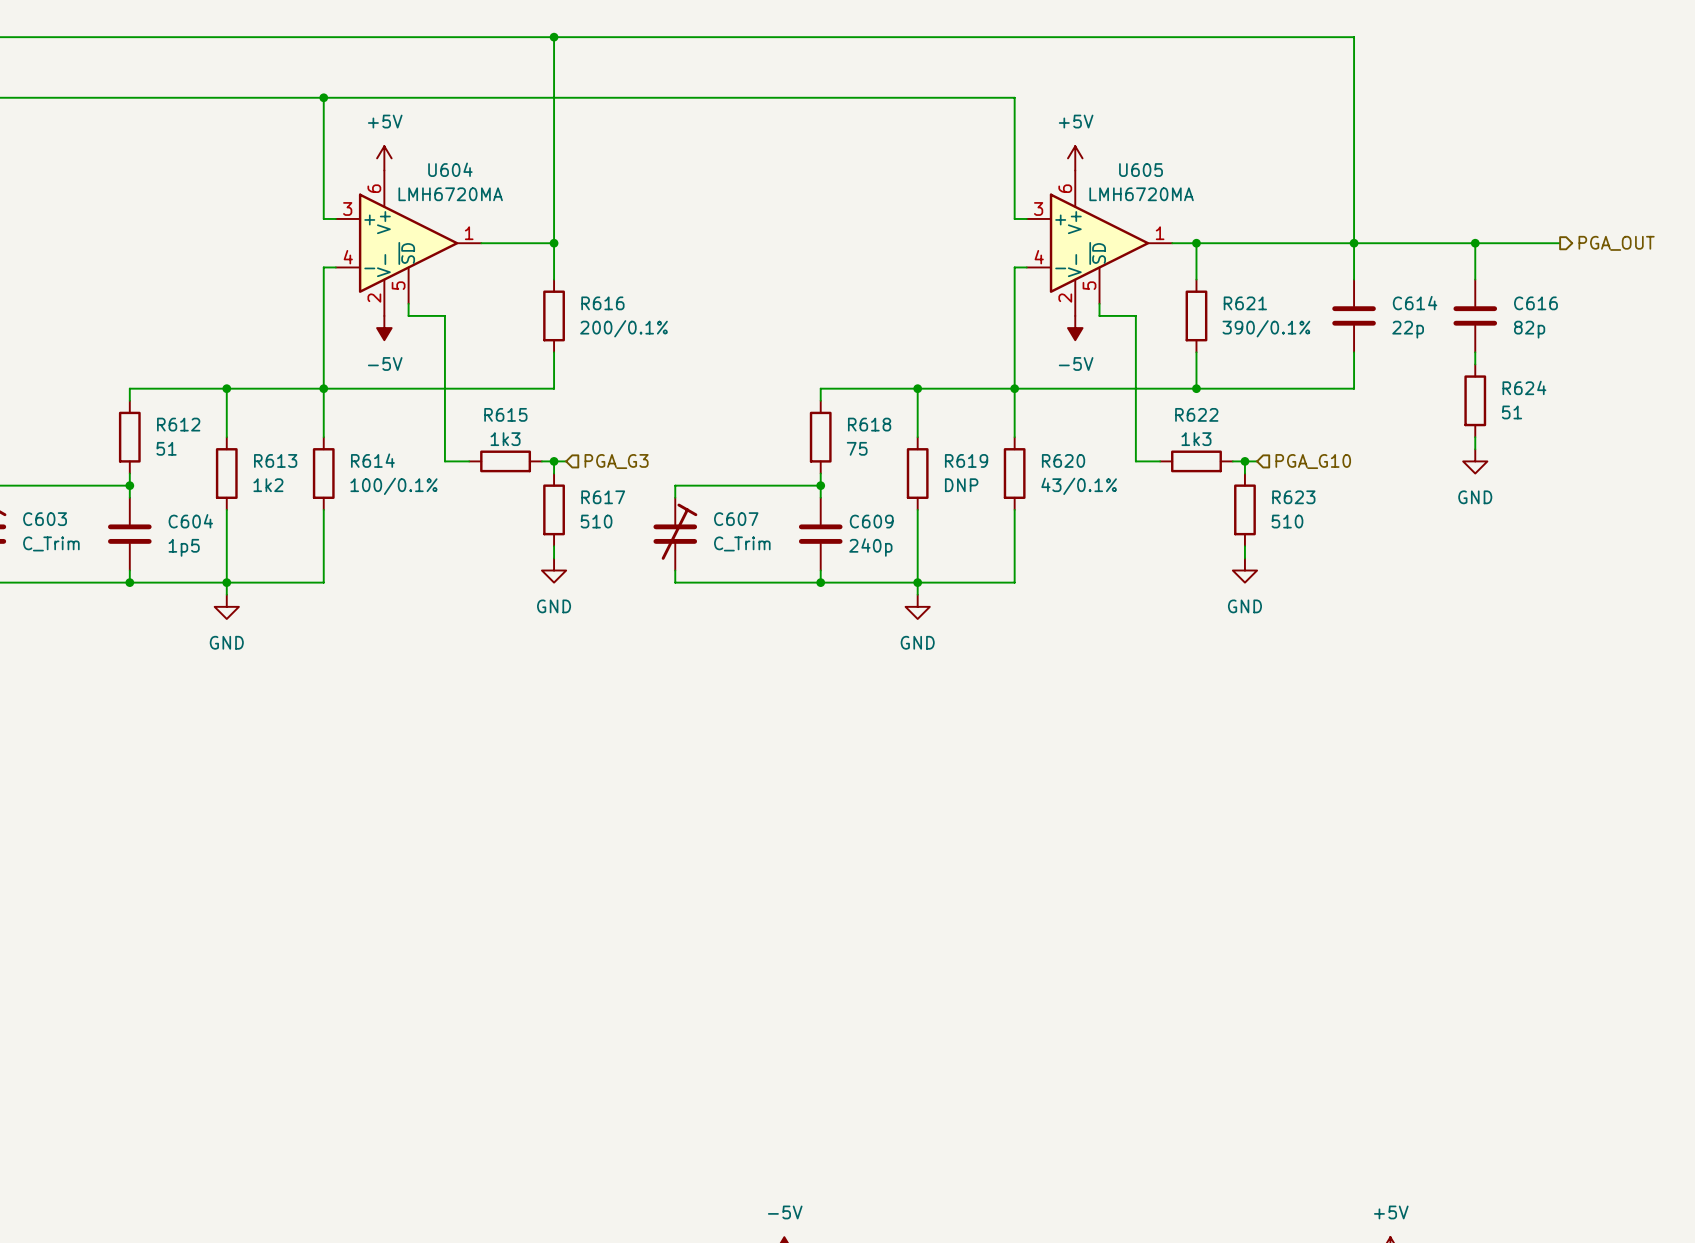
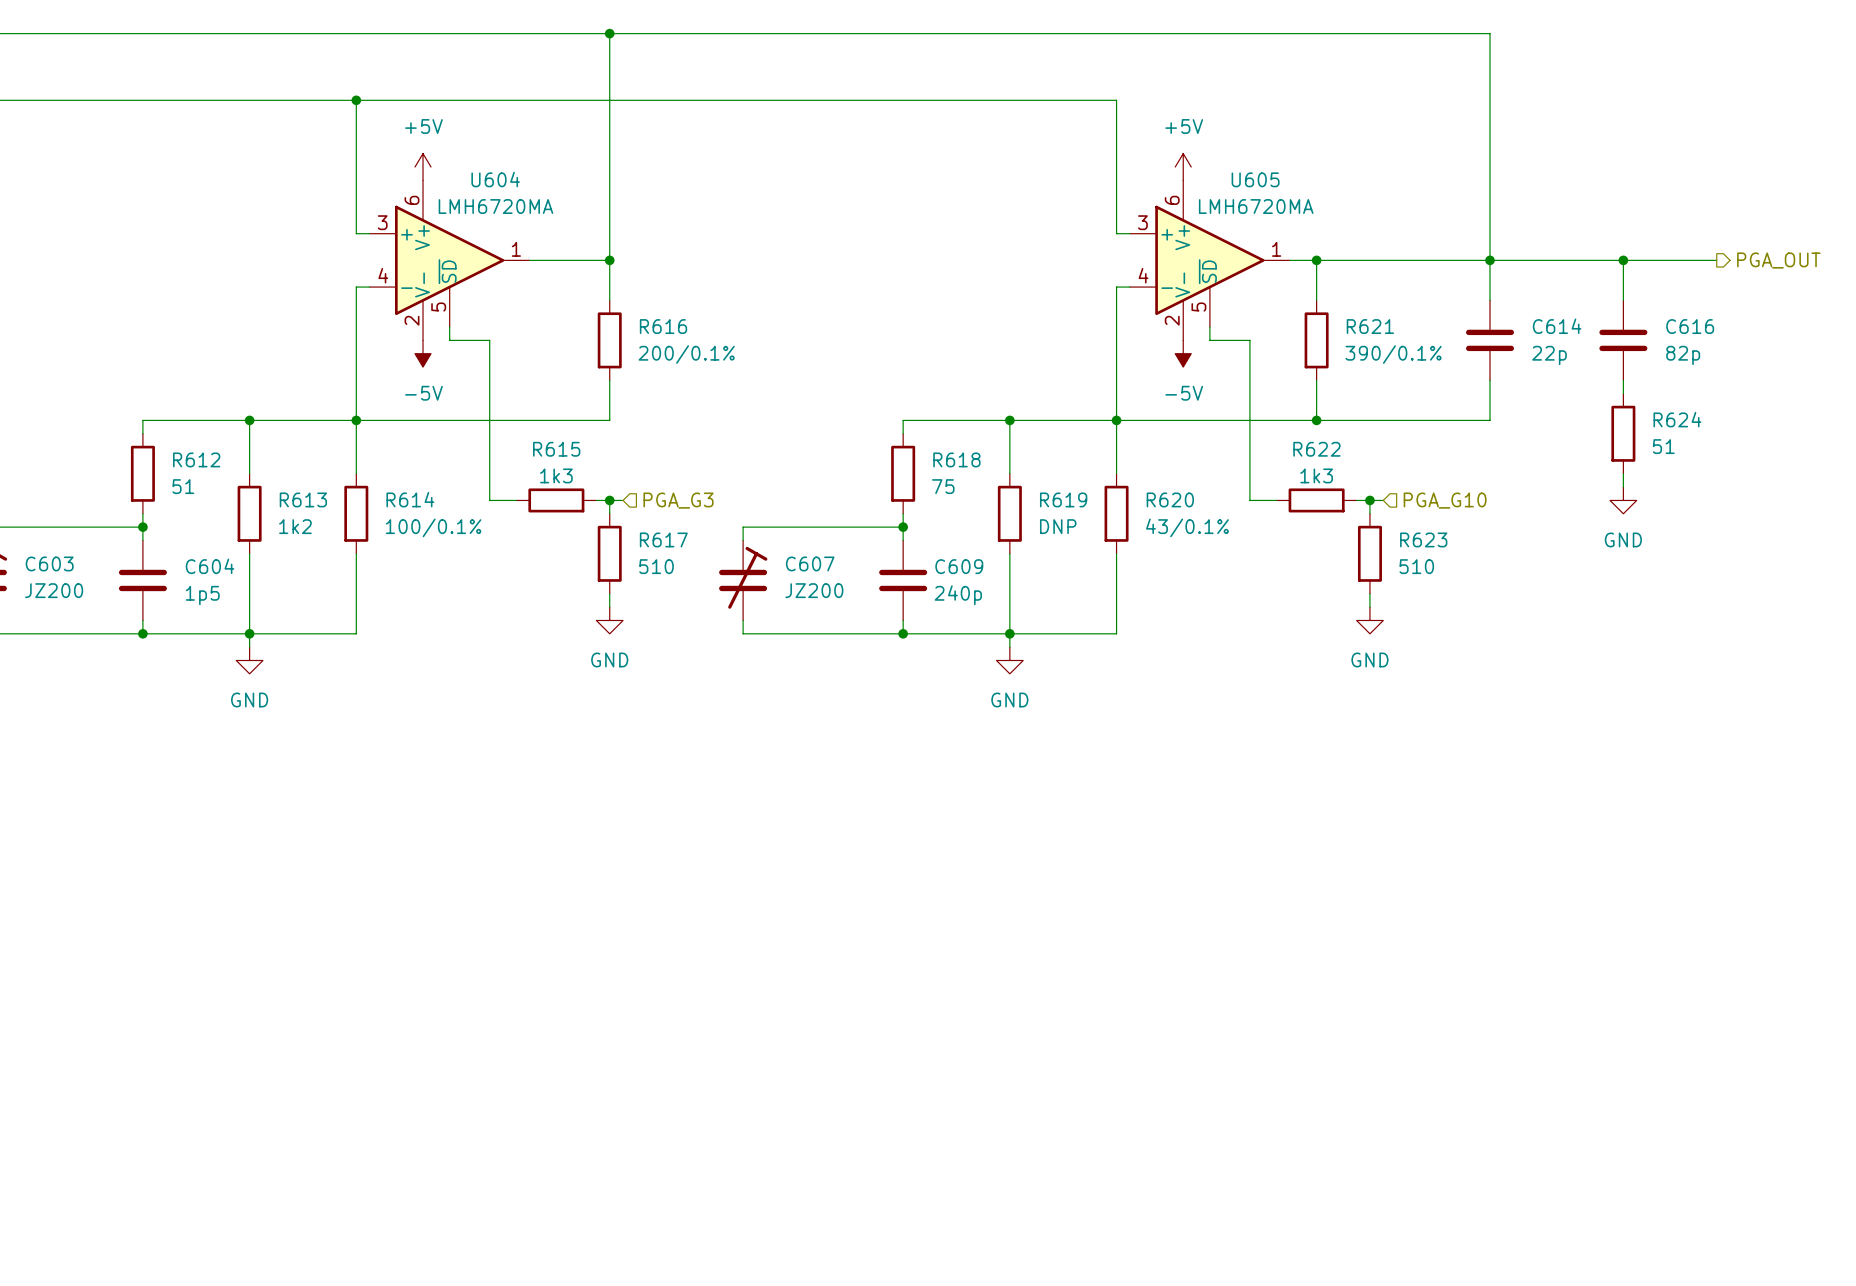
C603 value: C_Trim (51, 543) -> JZ200 (54, 590)
C607 value: C_Trim (742, 543) -> JZ200 (814, 590)

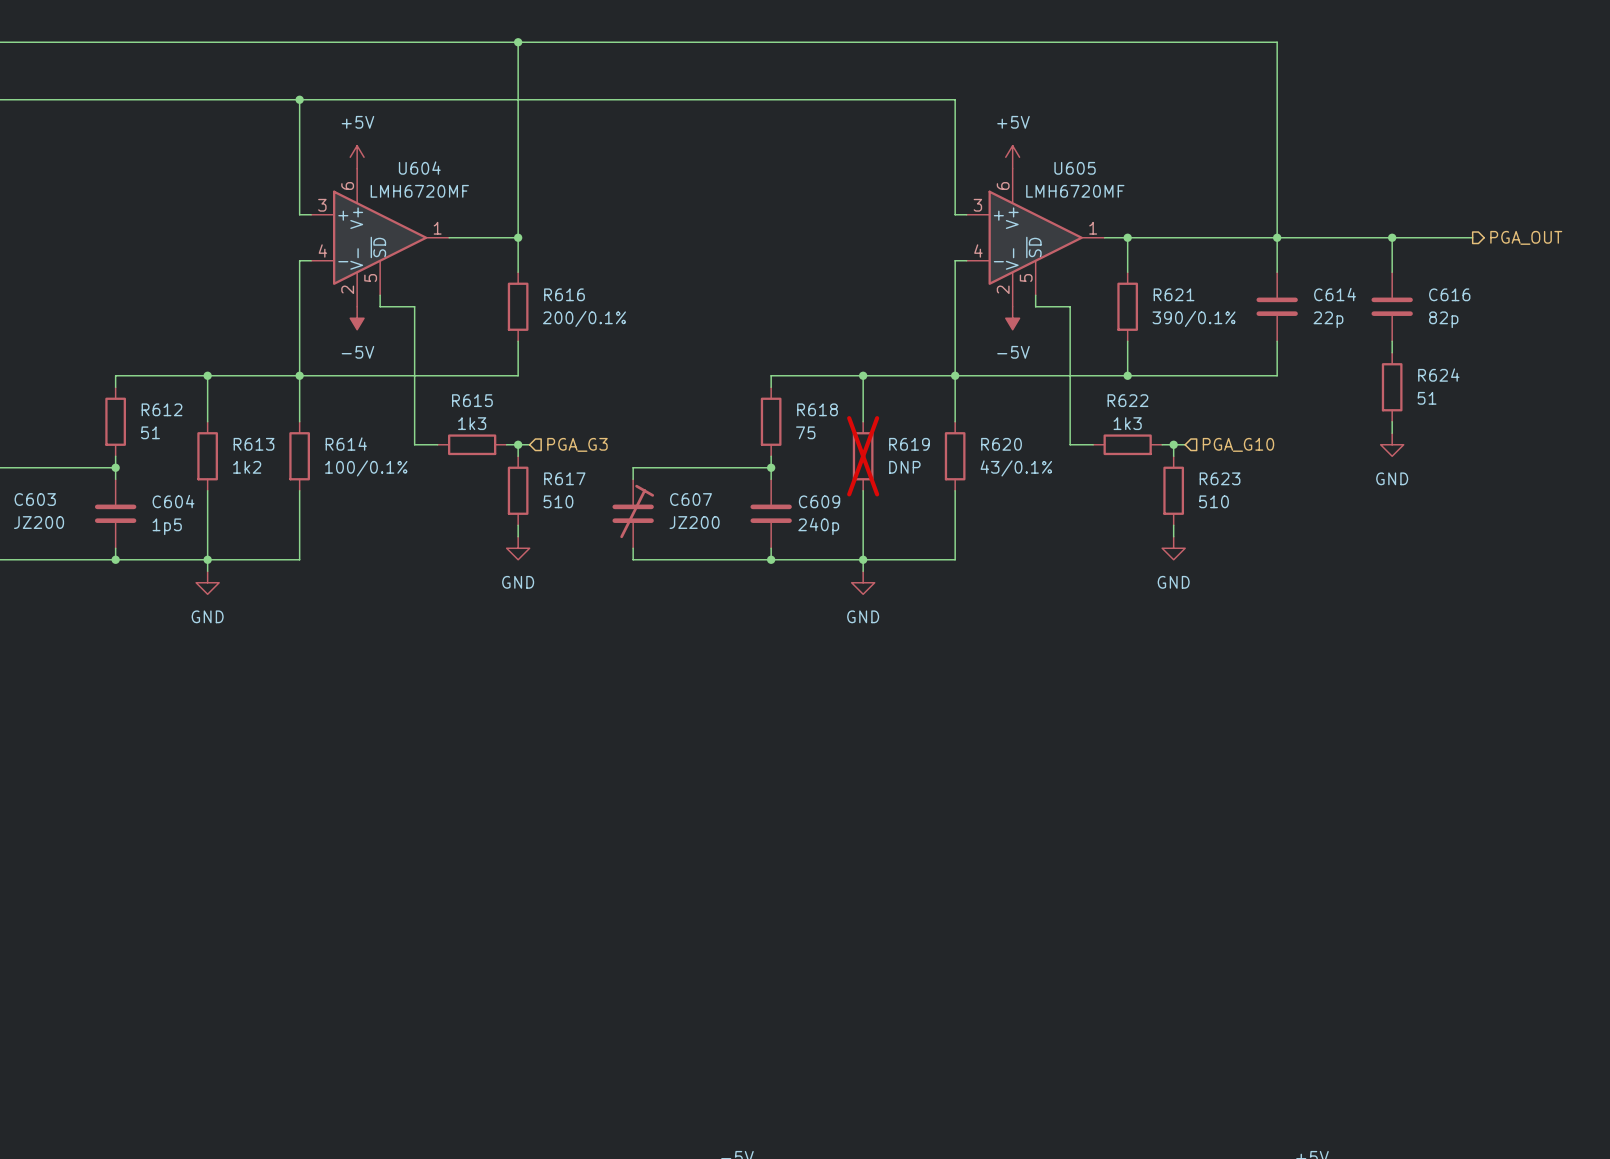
U604 value: LMH6720MA (495, 206) -> LMH6720MF (419, 191)
U605 value: LMH6720MA (1256, 206) -> LMH6720MF (1075, 191)
R619 do-not-place cross: none -> (863, 456)

